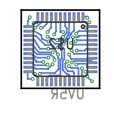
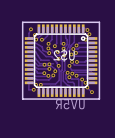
via: (48, 48) -> none
via: none -> (49, 64)
via: (52, 52) -> none
via: none -> (44, 64)

